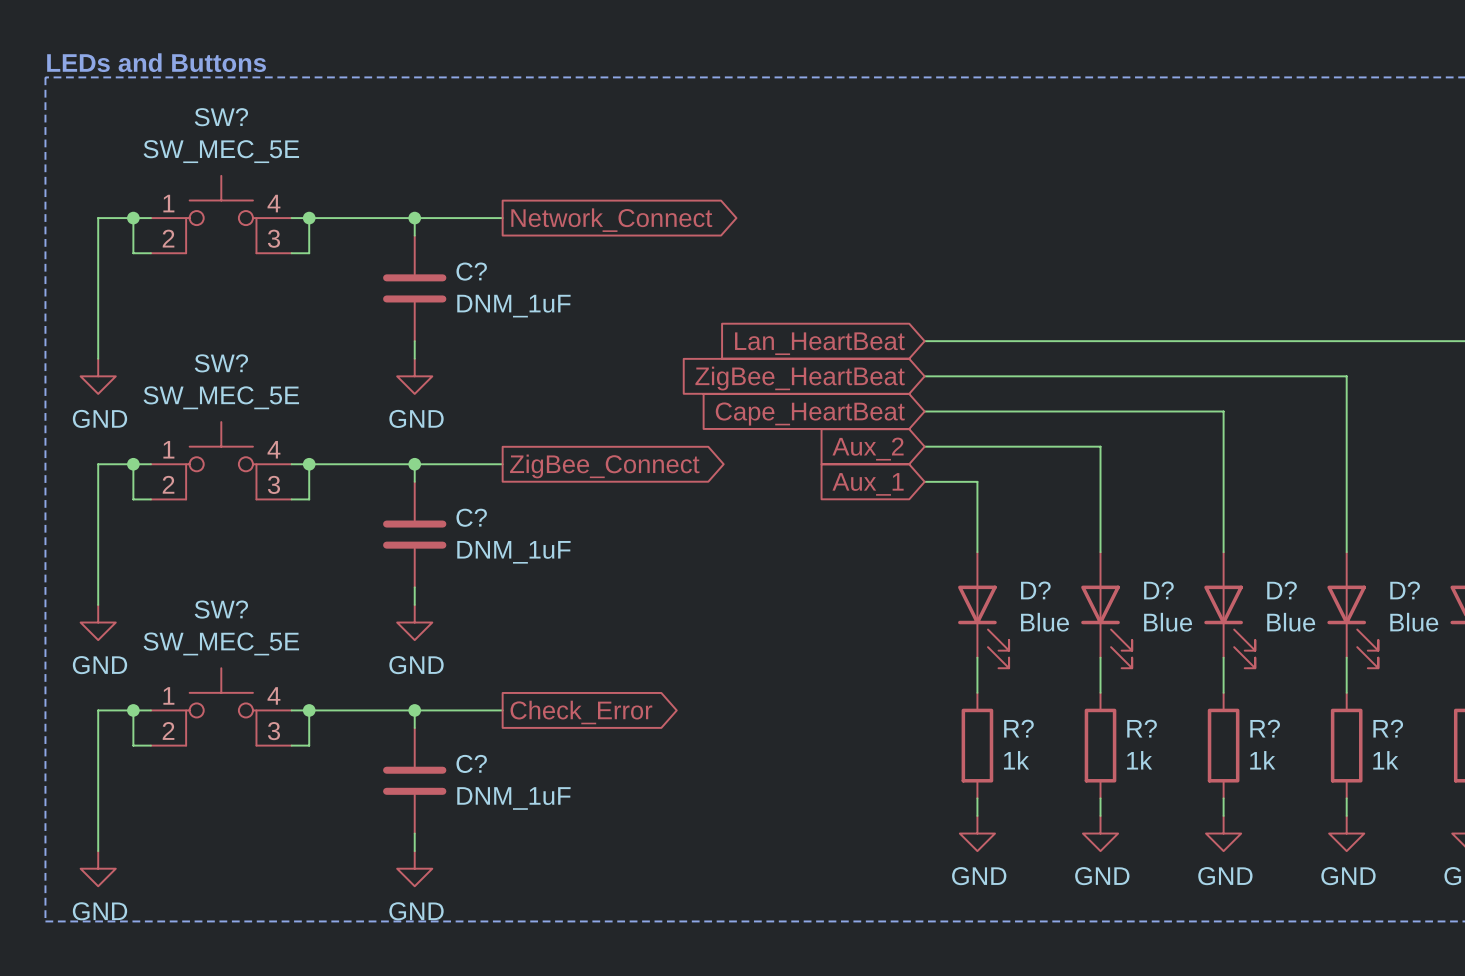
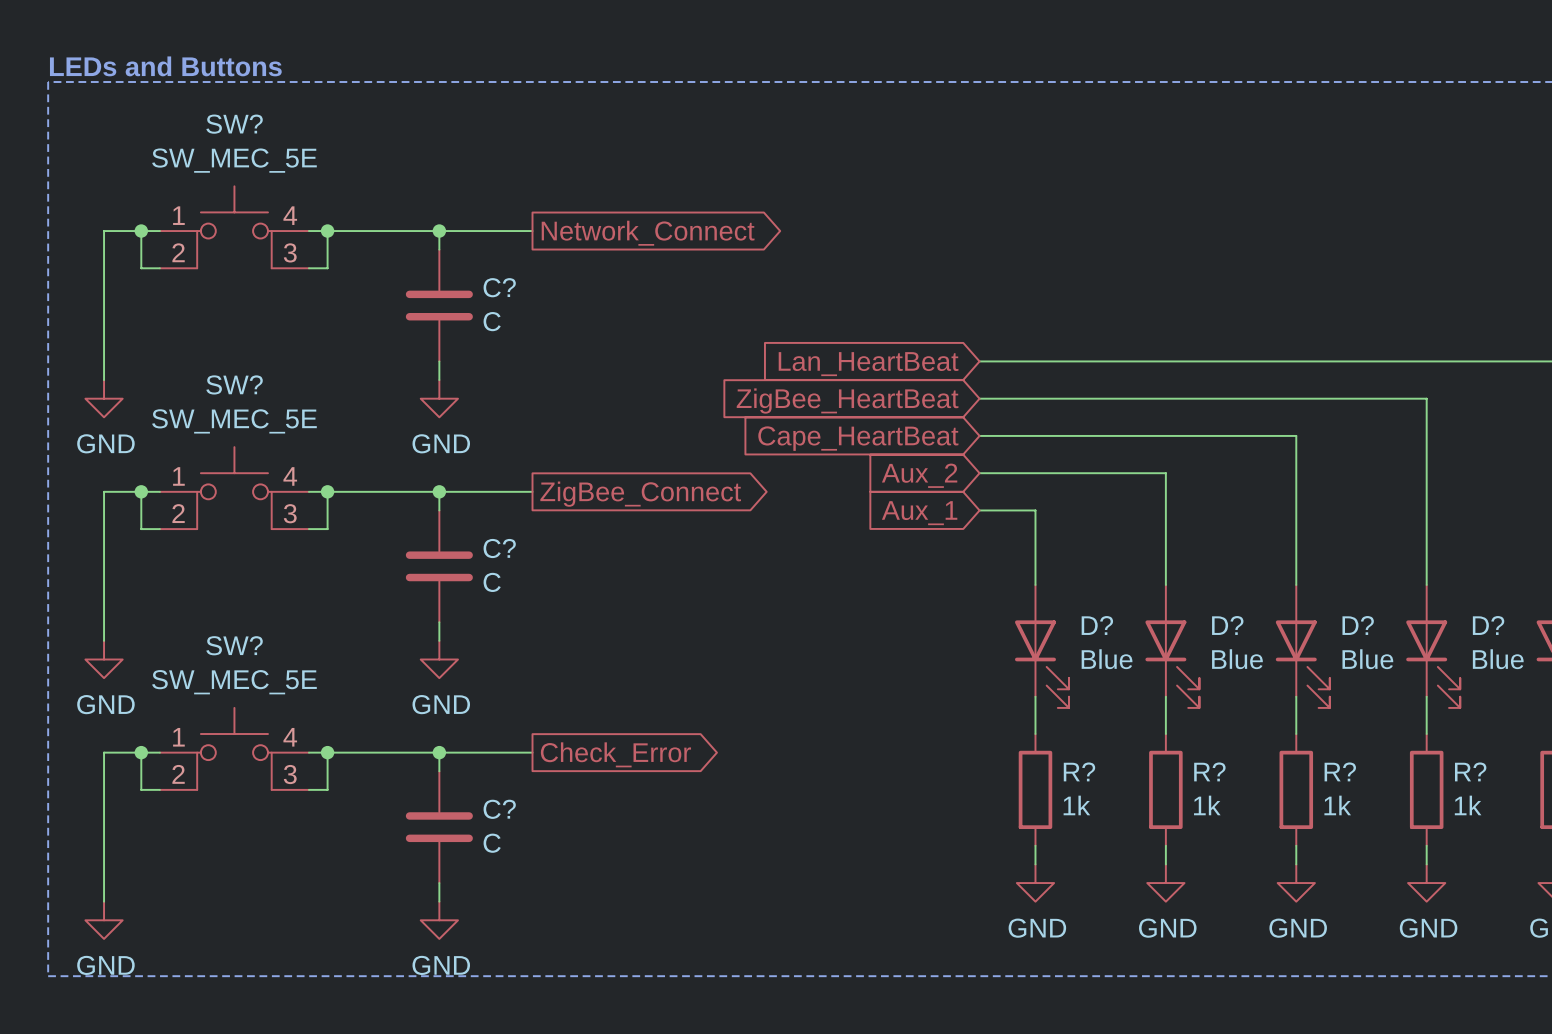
C? value: DNM_1uF (513, 306) -> C (492, 321)
C? value: DNM_1uF (513, 552) -> C (492, 582)
C? value: DNM_1uF (513, 798) -> C (492, 843)

